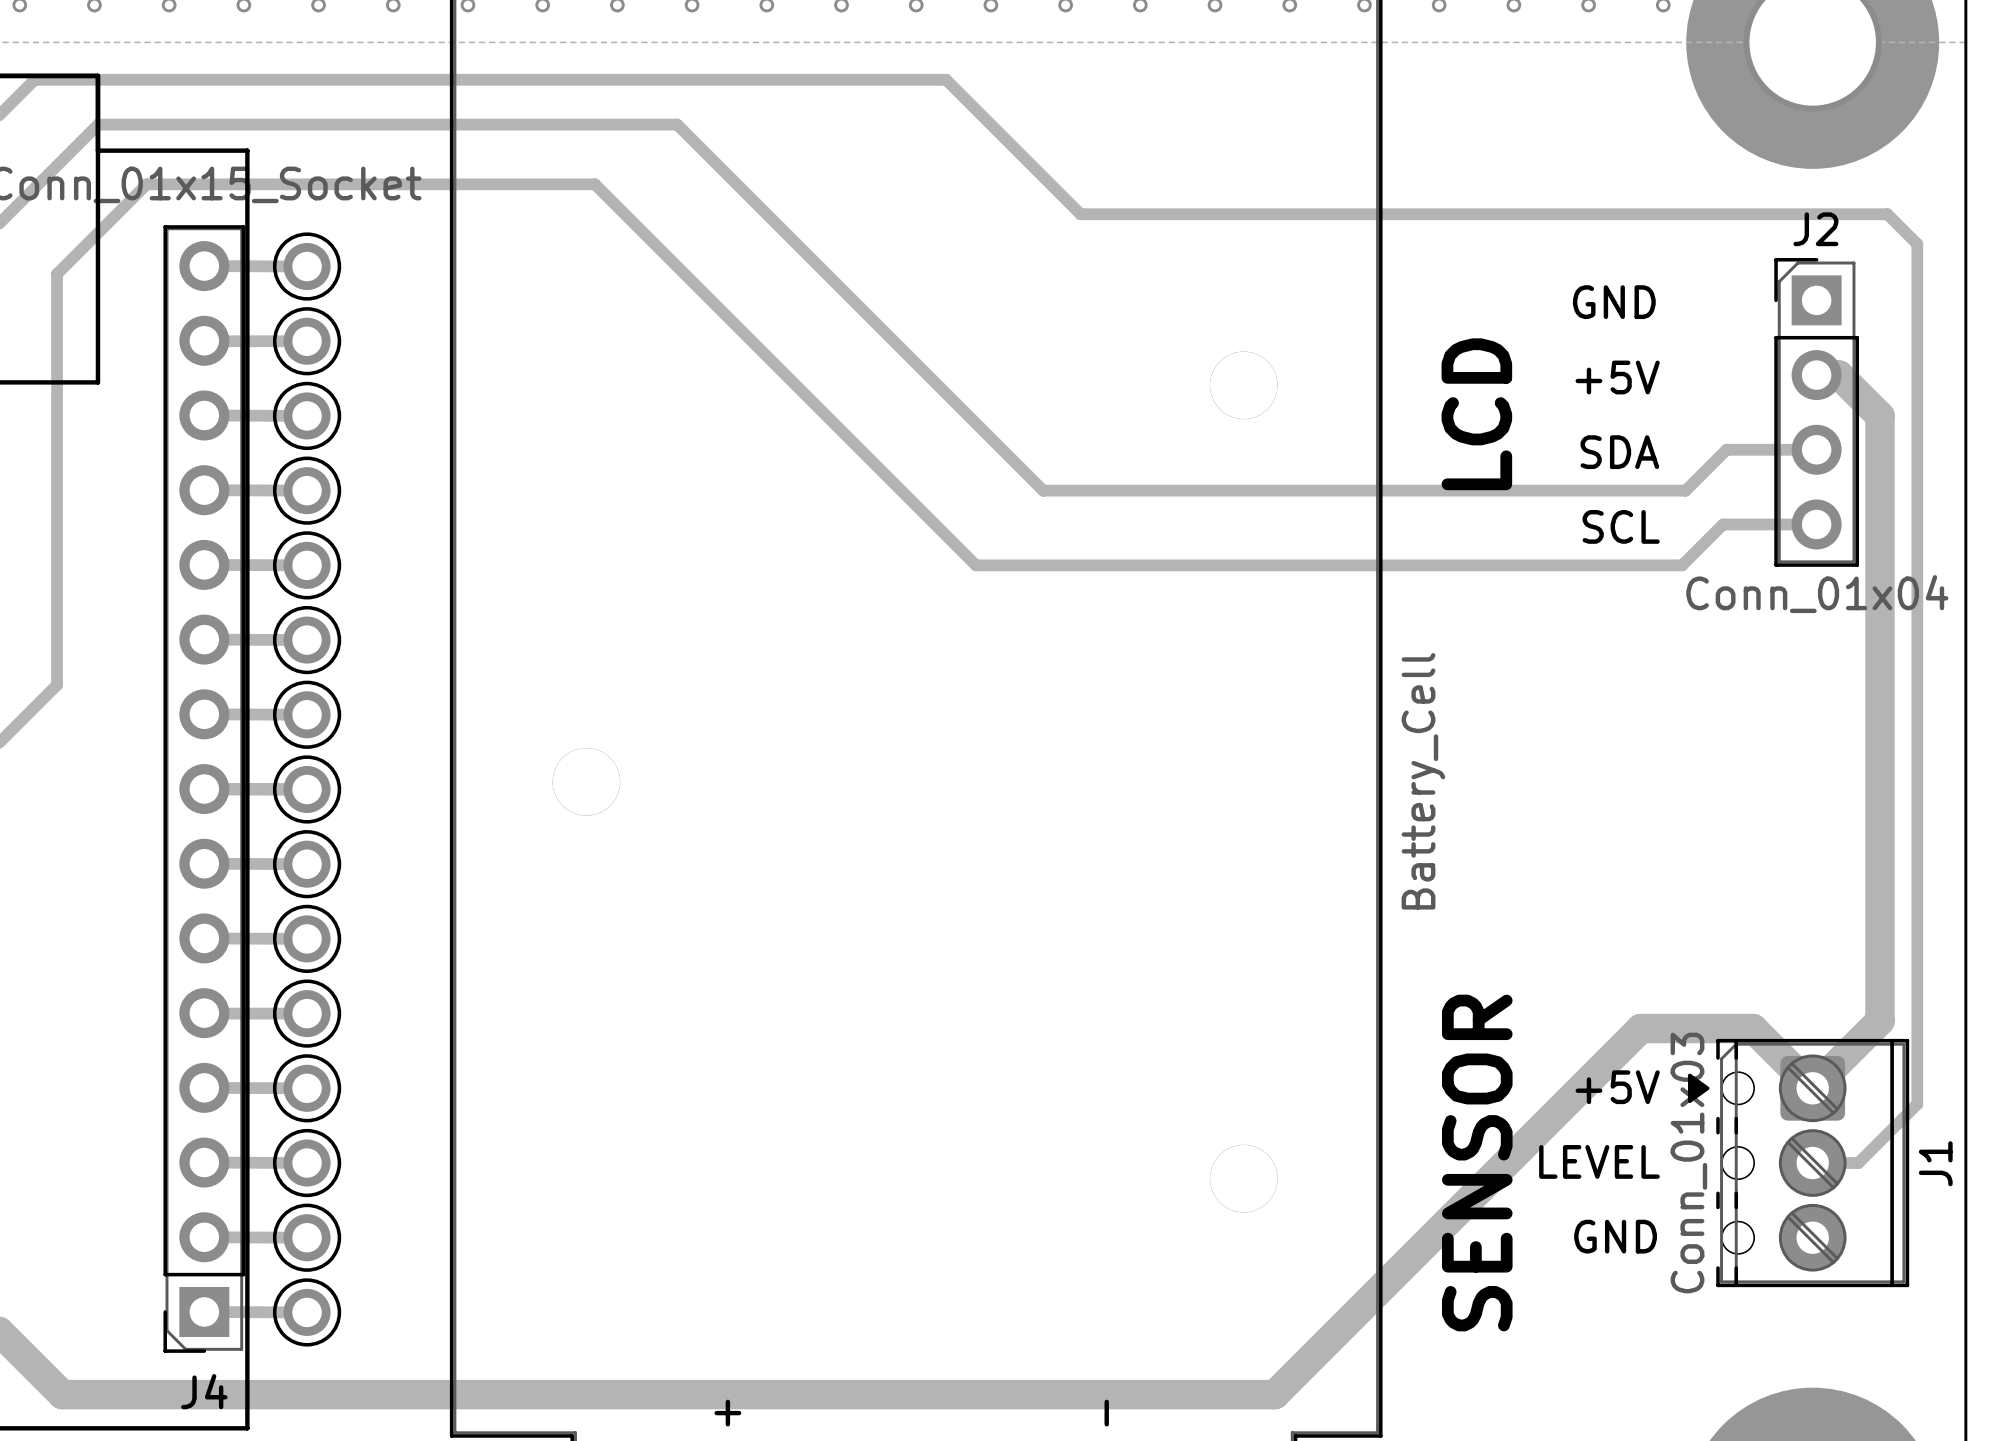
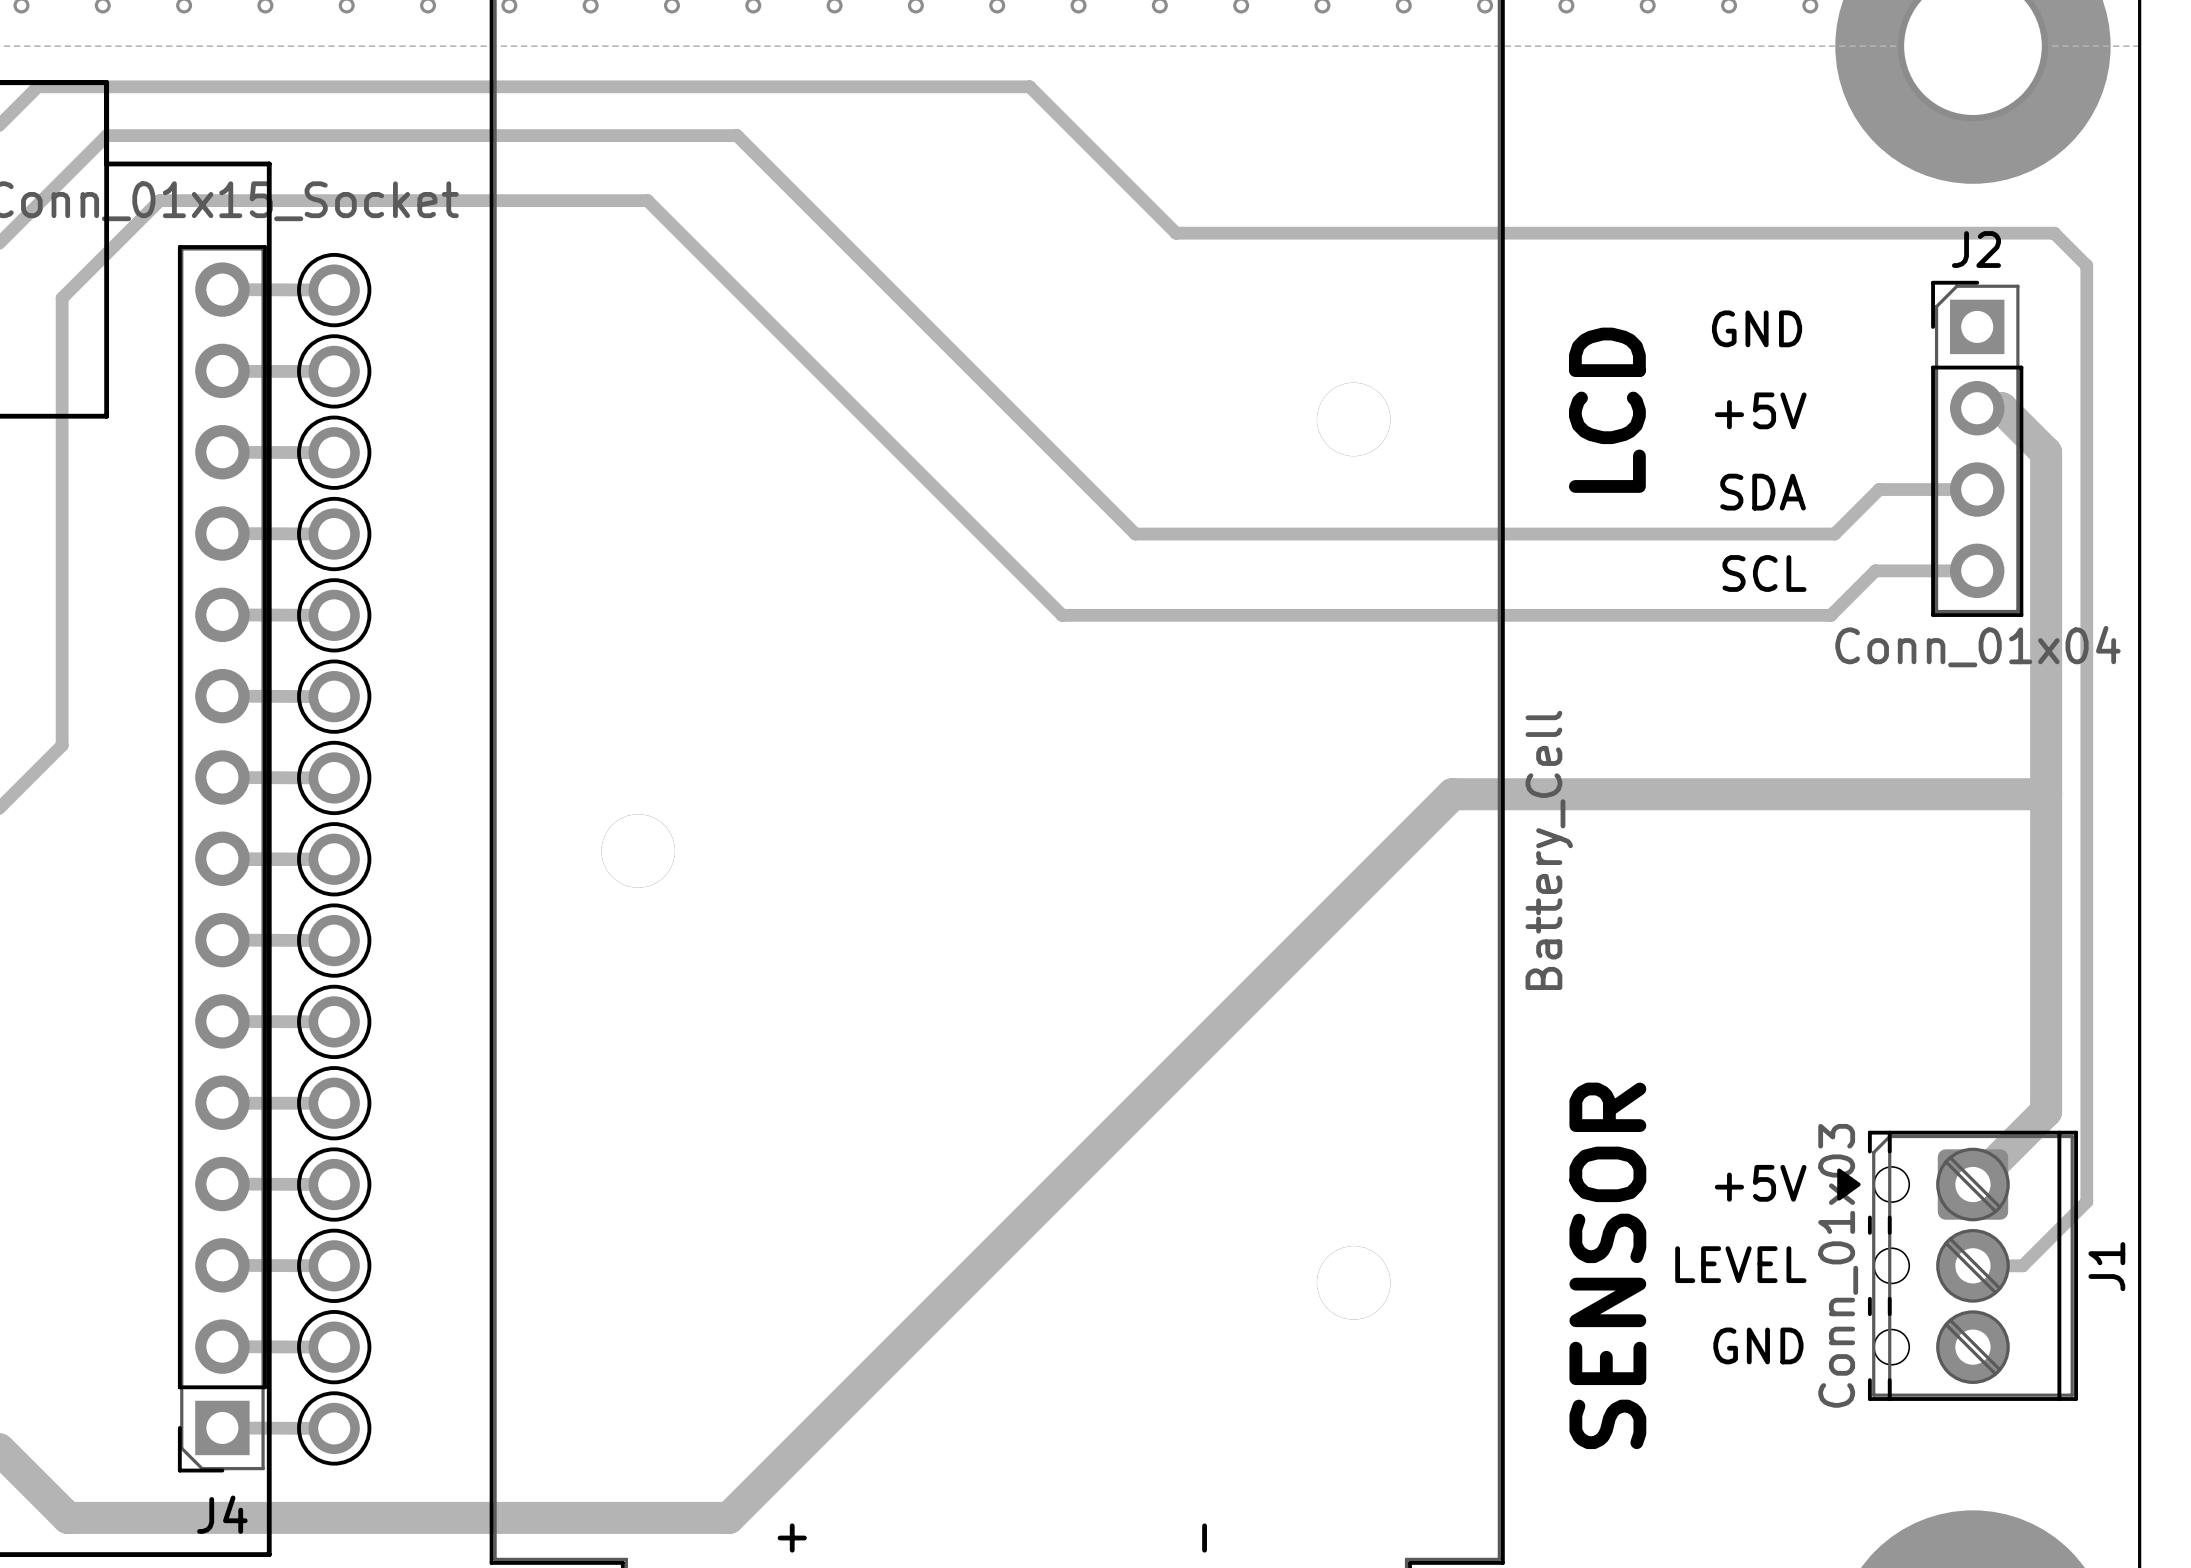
text position: LCD (1476, 414) -> LCD (1607, 410)
track: (1812, 1088) (1752, 1028) (1640, 1028) (1274, 1394) (669, 1394) -> (2046, 794) (1452, 794) (728, 1517)

